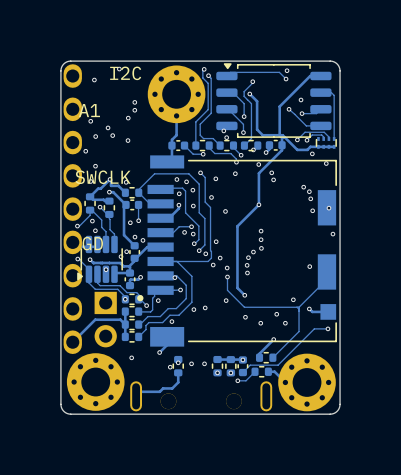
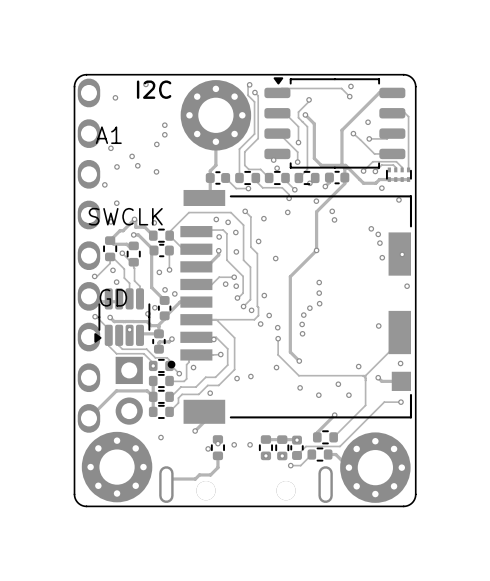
via: none -> (400, 363)

